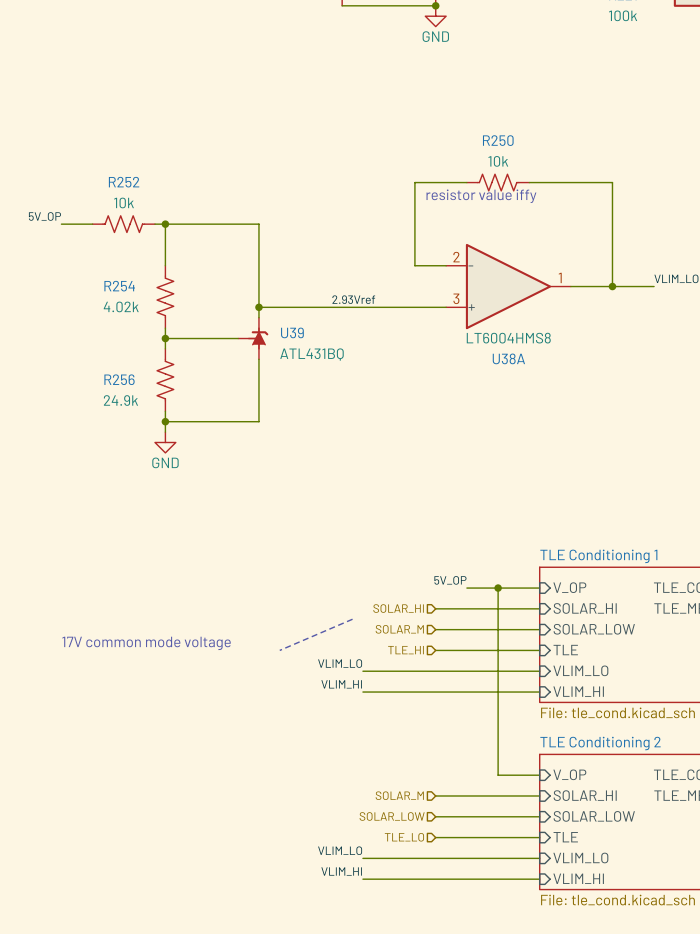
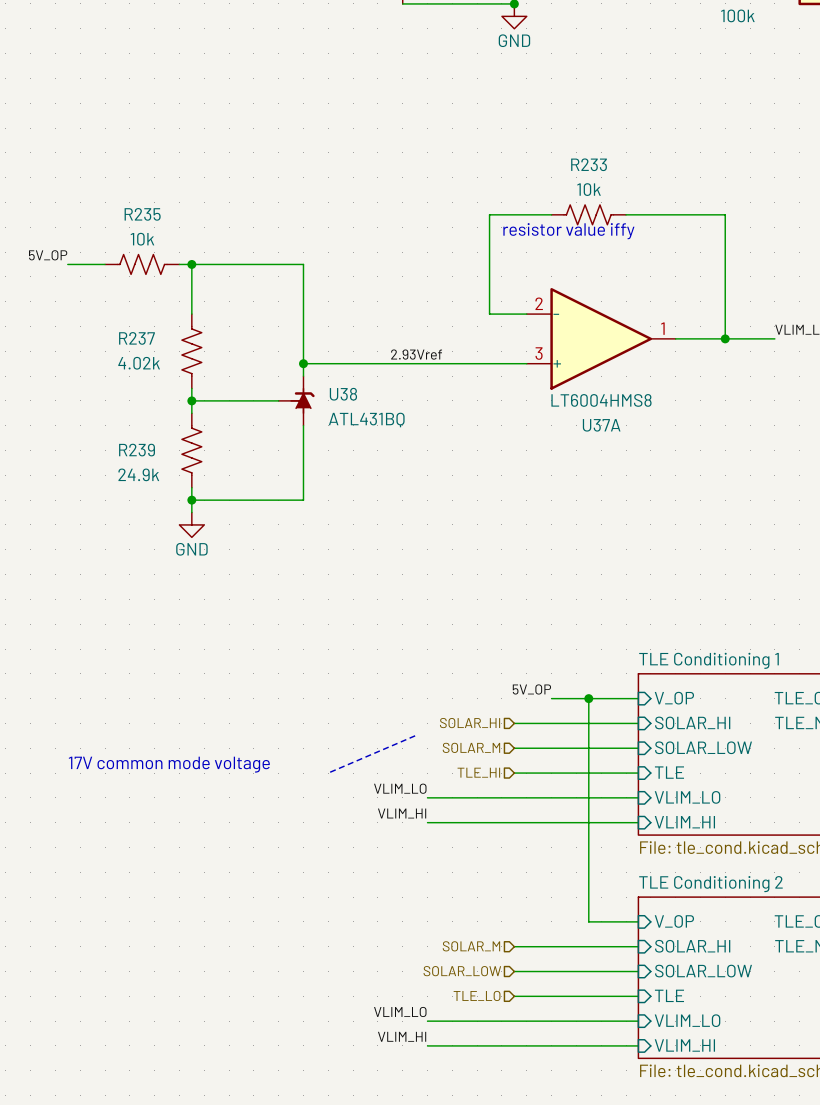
R250 name: R250 (498, 140) -> R233 (589, 164)
R252 name: R252 (124, 182) -> R235 (142, 214)
R254 name: R254 (119, 286) -> R237 (136, 338)
U39 name: U39 (292, 332) -> U38 (343, 394)
U38A name: U38A (508, 358) -> U37A (601, 425)
R256 name: R256 (119, 379) -> R239 (137, 450)

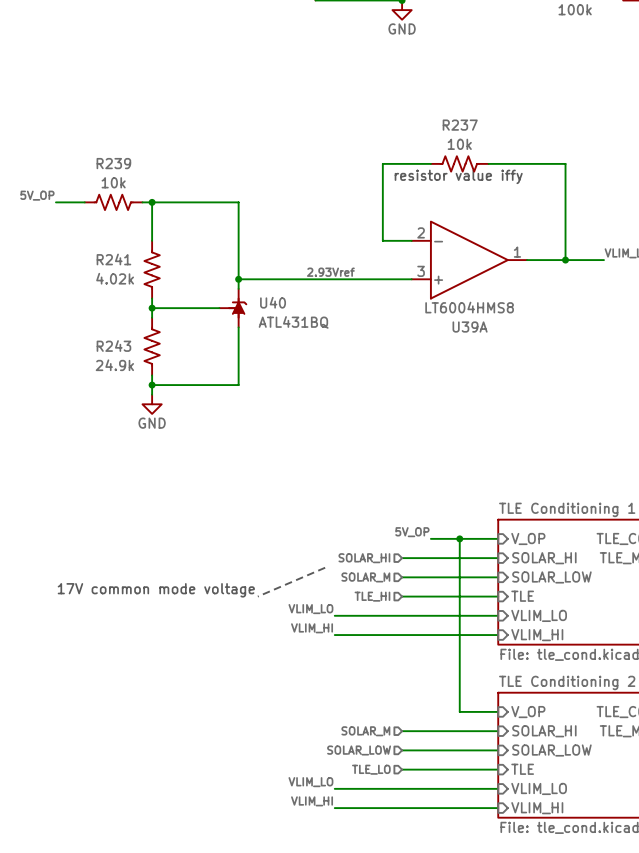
R233 name: R233 (589, 164) -> R237 (460, 125)
R235 name: R235 (142, 214) -> R239 (113, 163)
R237 name: R237 (136, 338) -> R241 (113, 259)
U38 name: U38 (343, 394) -> U40 (273, 302)
U37A name: U37A (601, 425) -> U39A (470, 327)
R239 name: R239 (137, 450) -> R243 (113, 346)

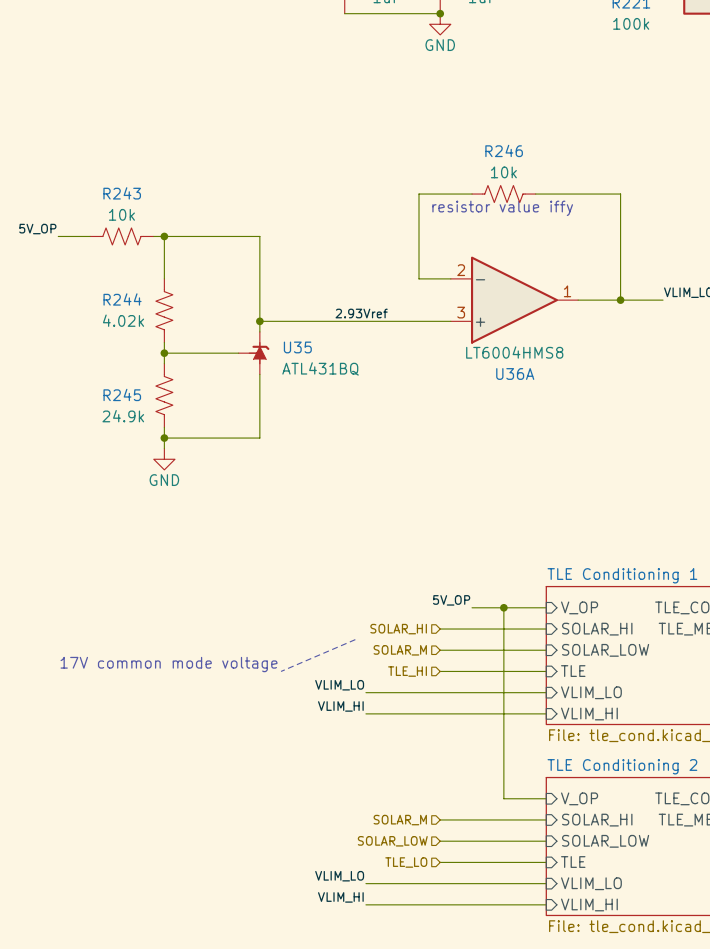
R237 name: R237 (460, 125) -> R246 (504, 150)
R239 name: R239 (113, 163) -> R243 (122, 193)
R241 name: R241 (113, 259) -> R244 (122, 299)
U40 name: U40 (273, 302) -> U35 (297, 347)
U39A name: U39A (470, 327) -> U36A (515, 373)
R243 name: R243 (113, 346) -> R245 (122, 394)

